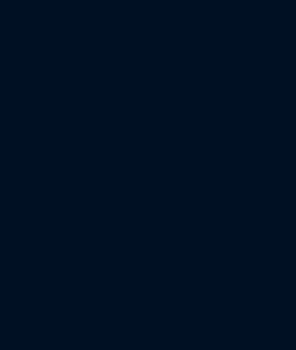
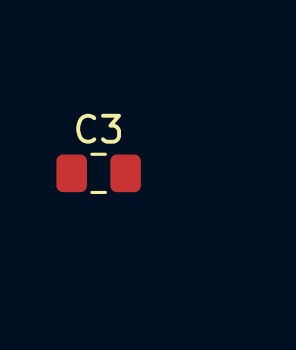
C3: none -> (98, 173)

